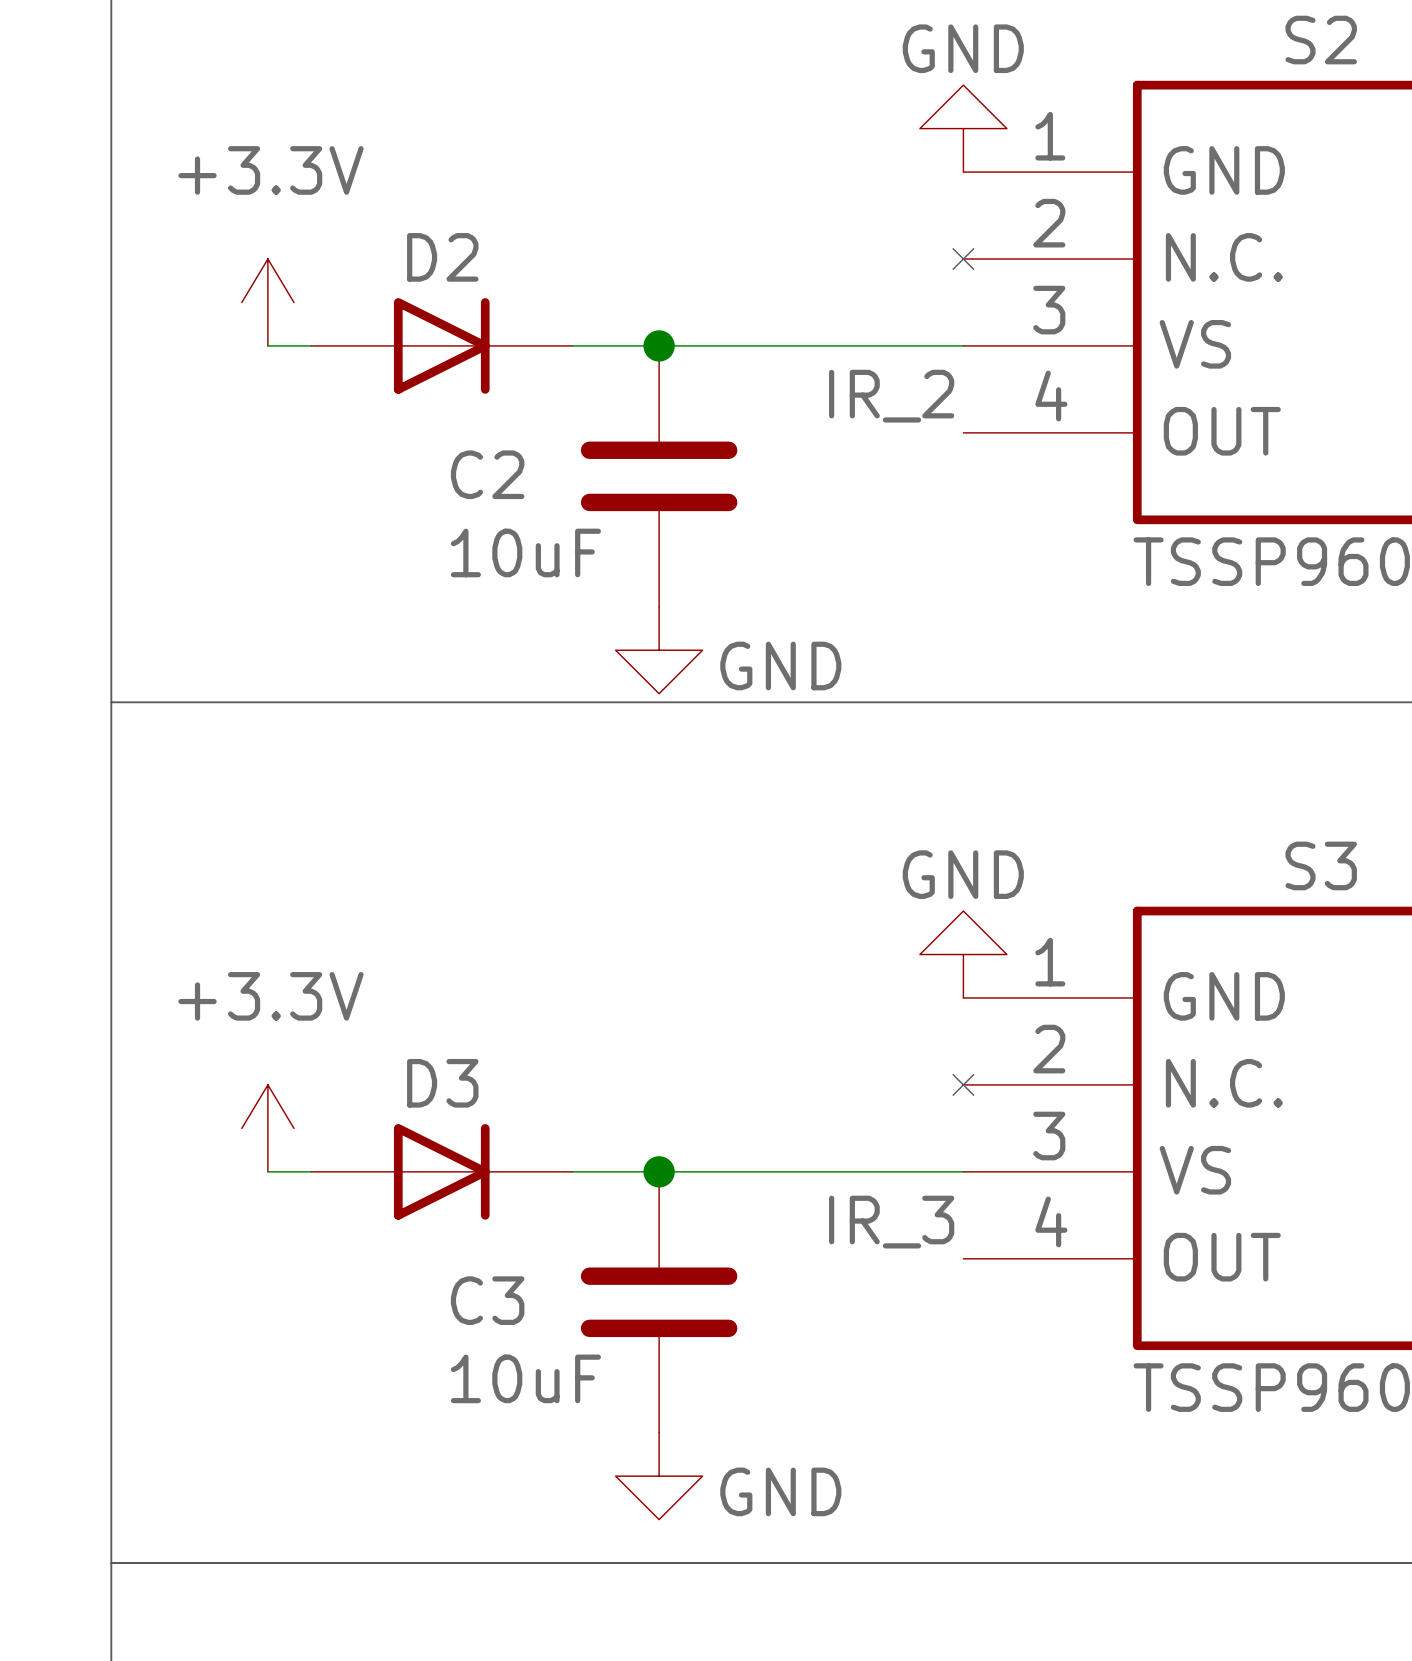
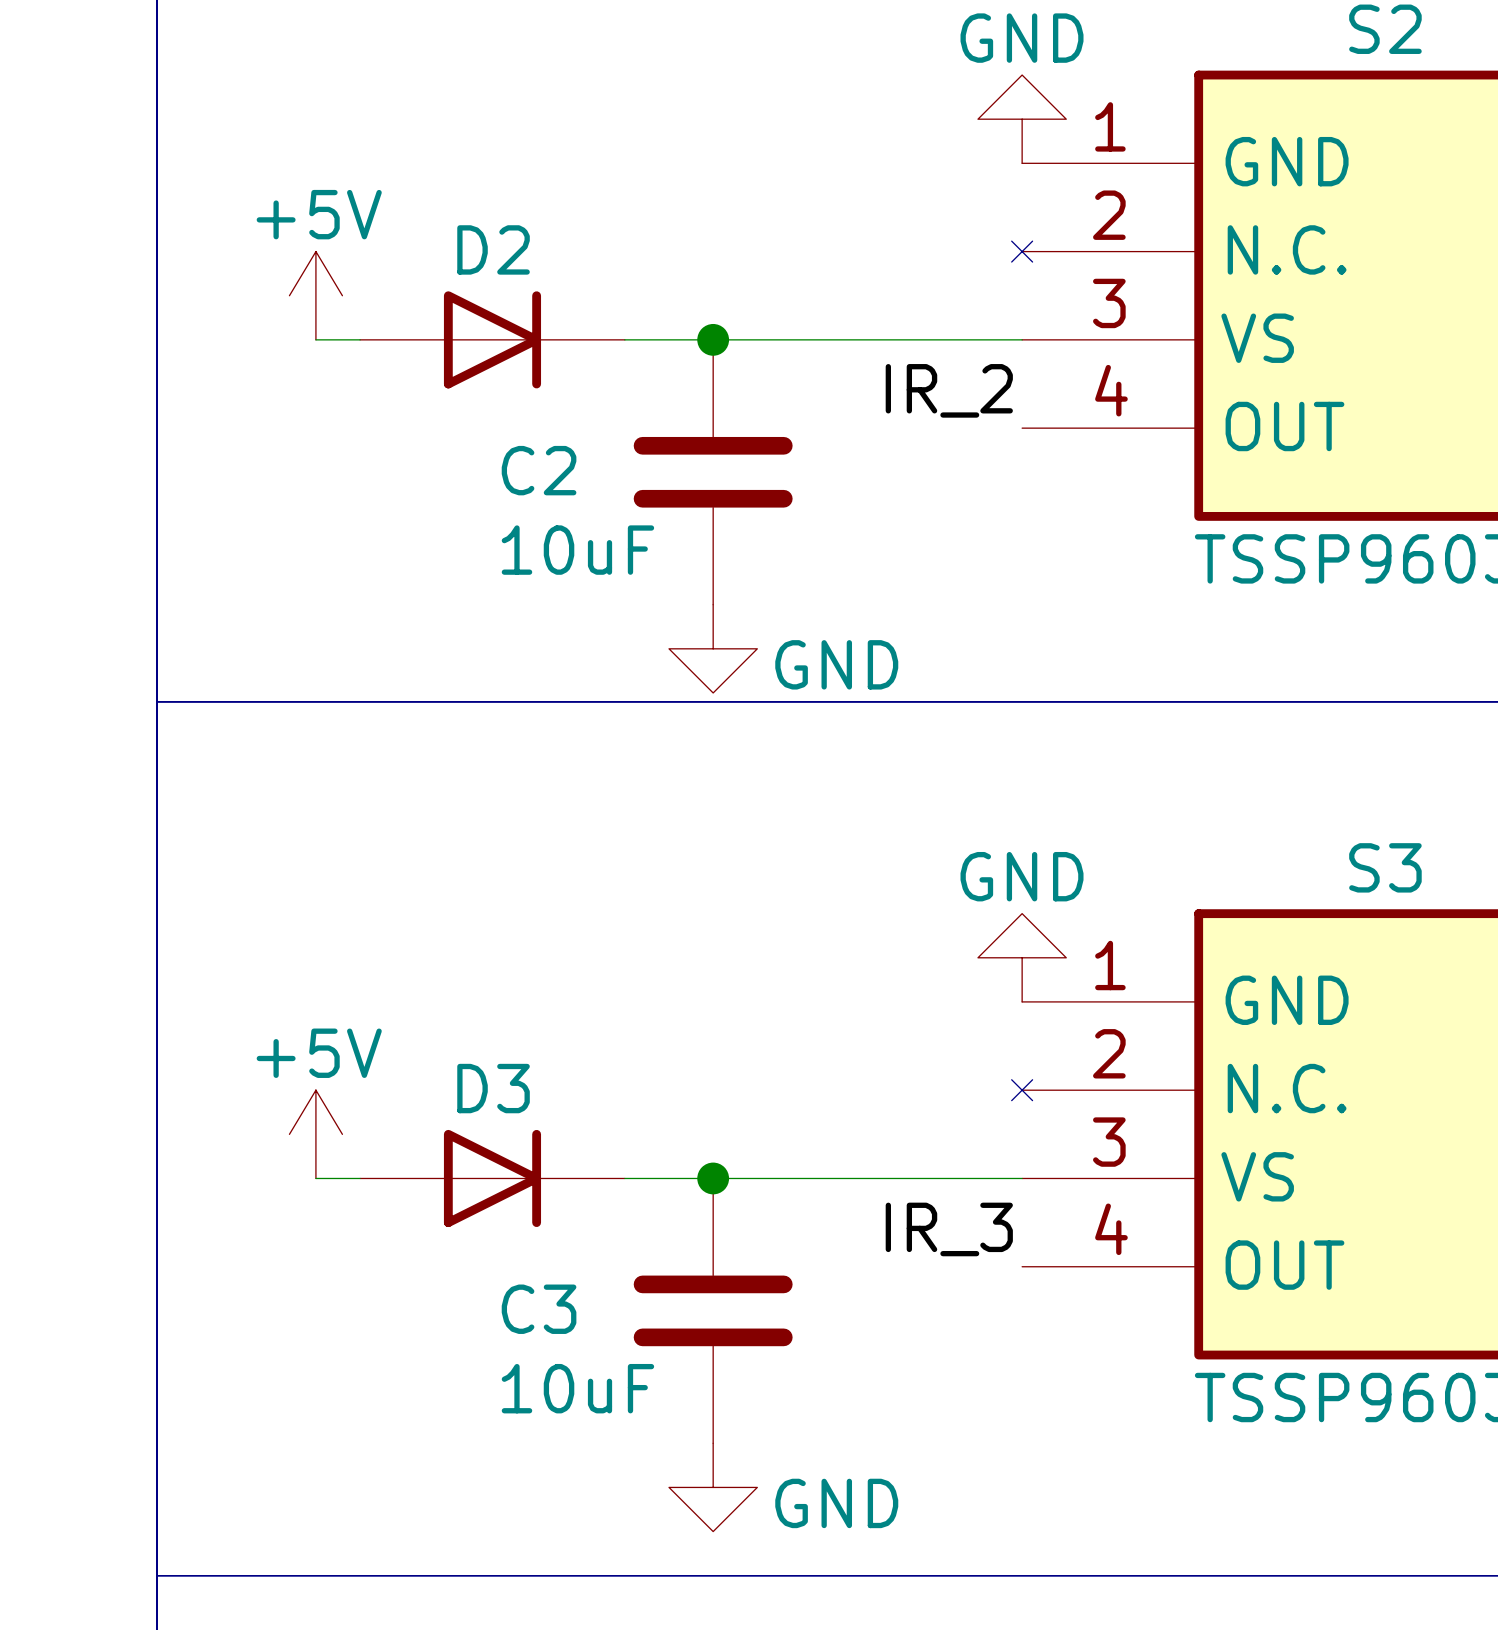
power symbol: +3.3V (267, 302) -> +5V (315, 295)
power symbol: +3.3V (267, 1128) -> +5V (315, 1134)

